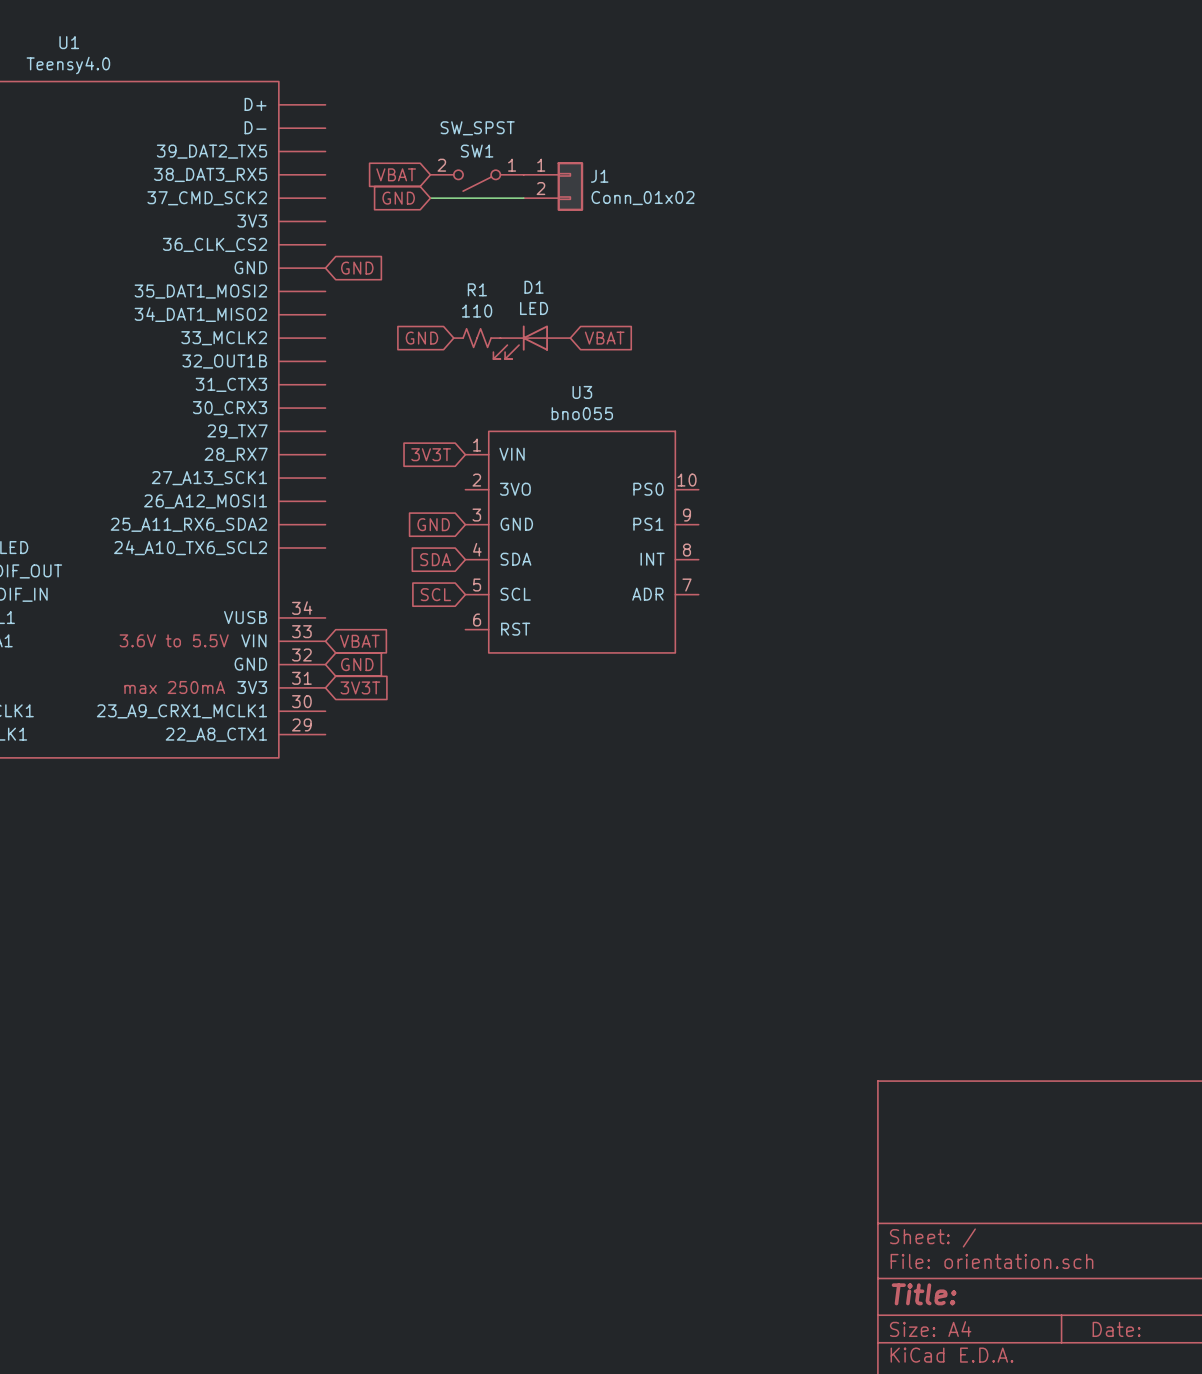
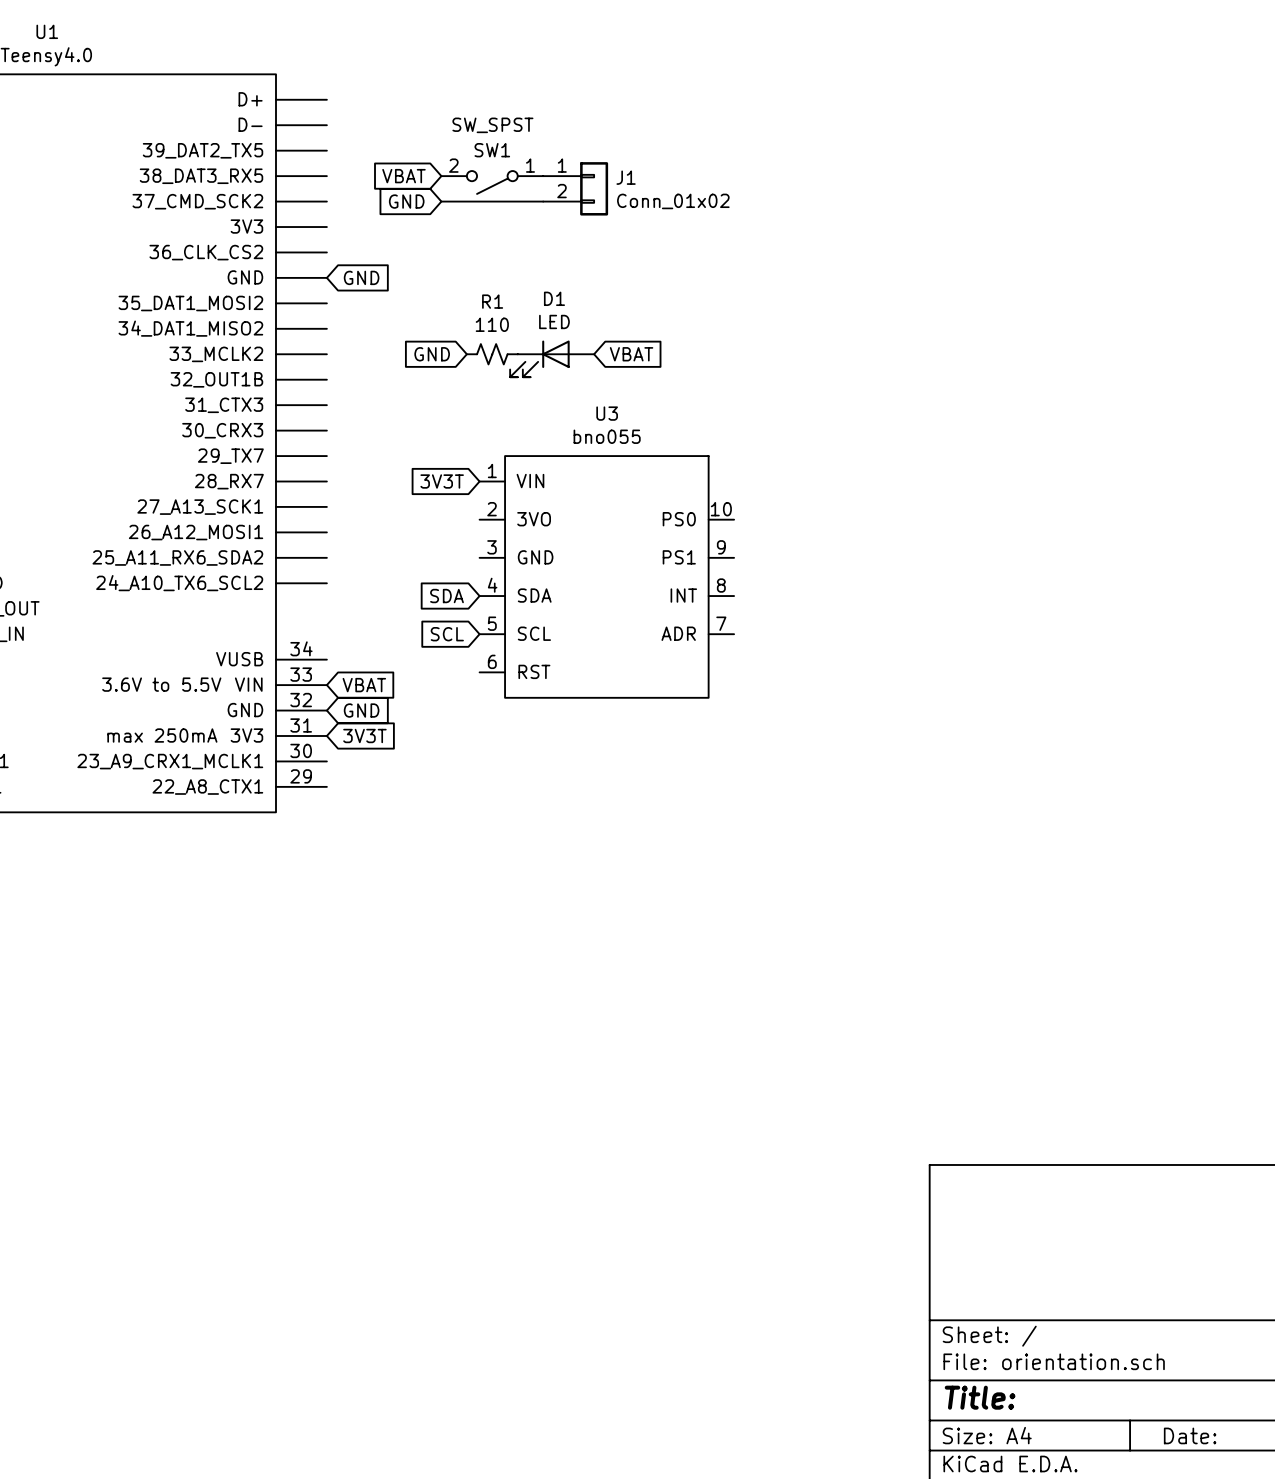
global label: GND (433, 524) -> none

